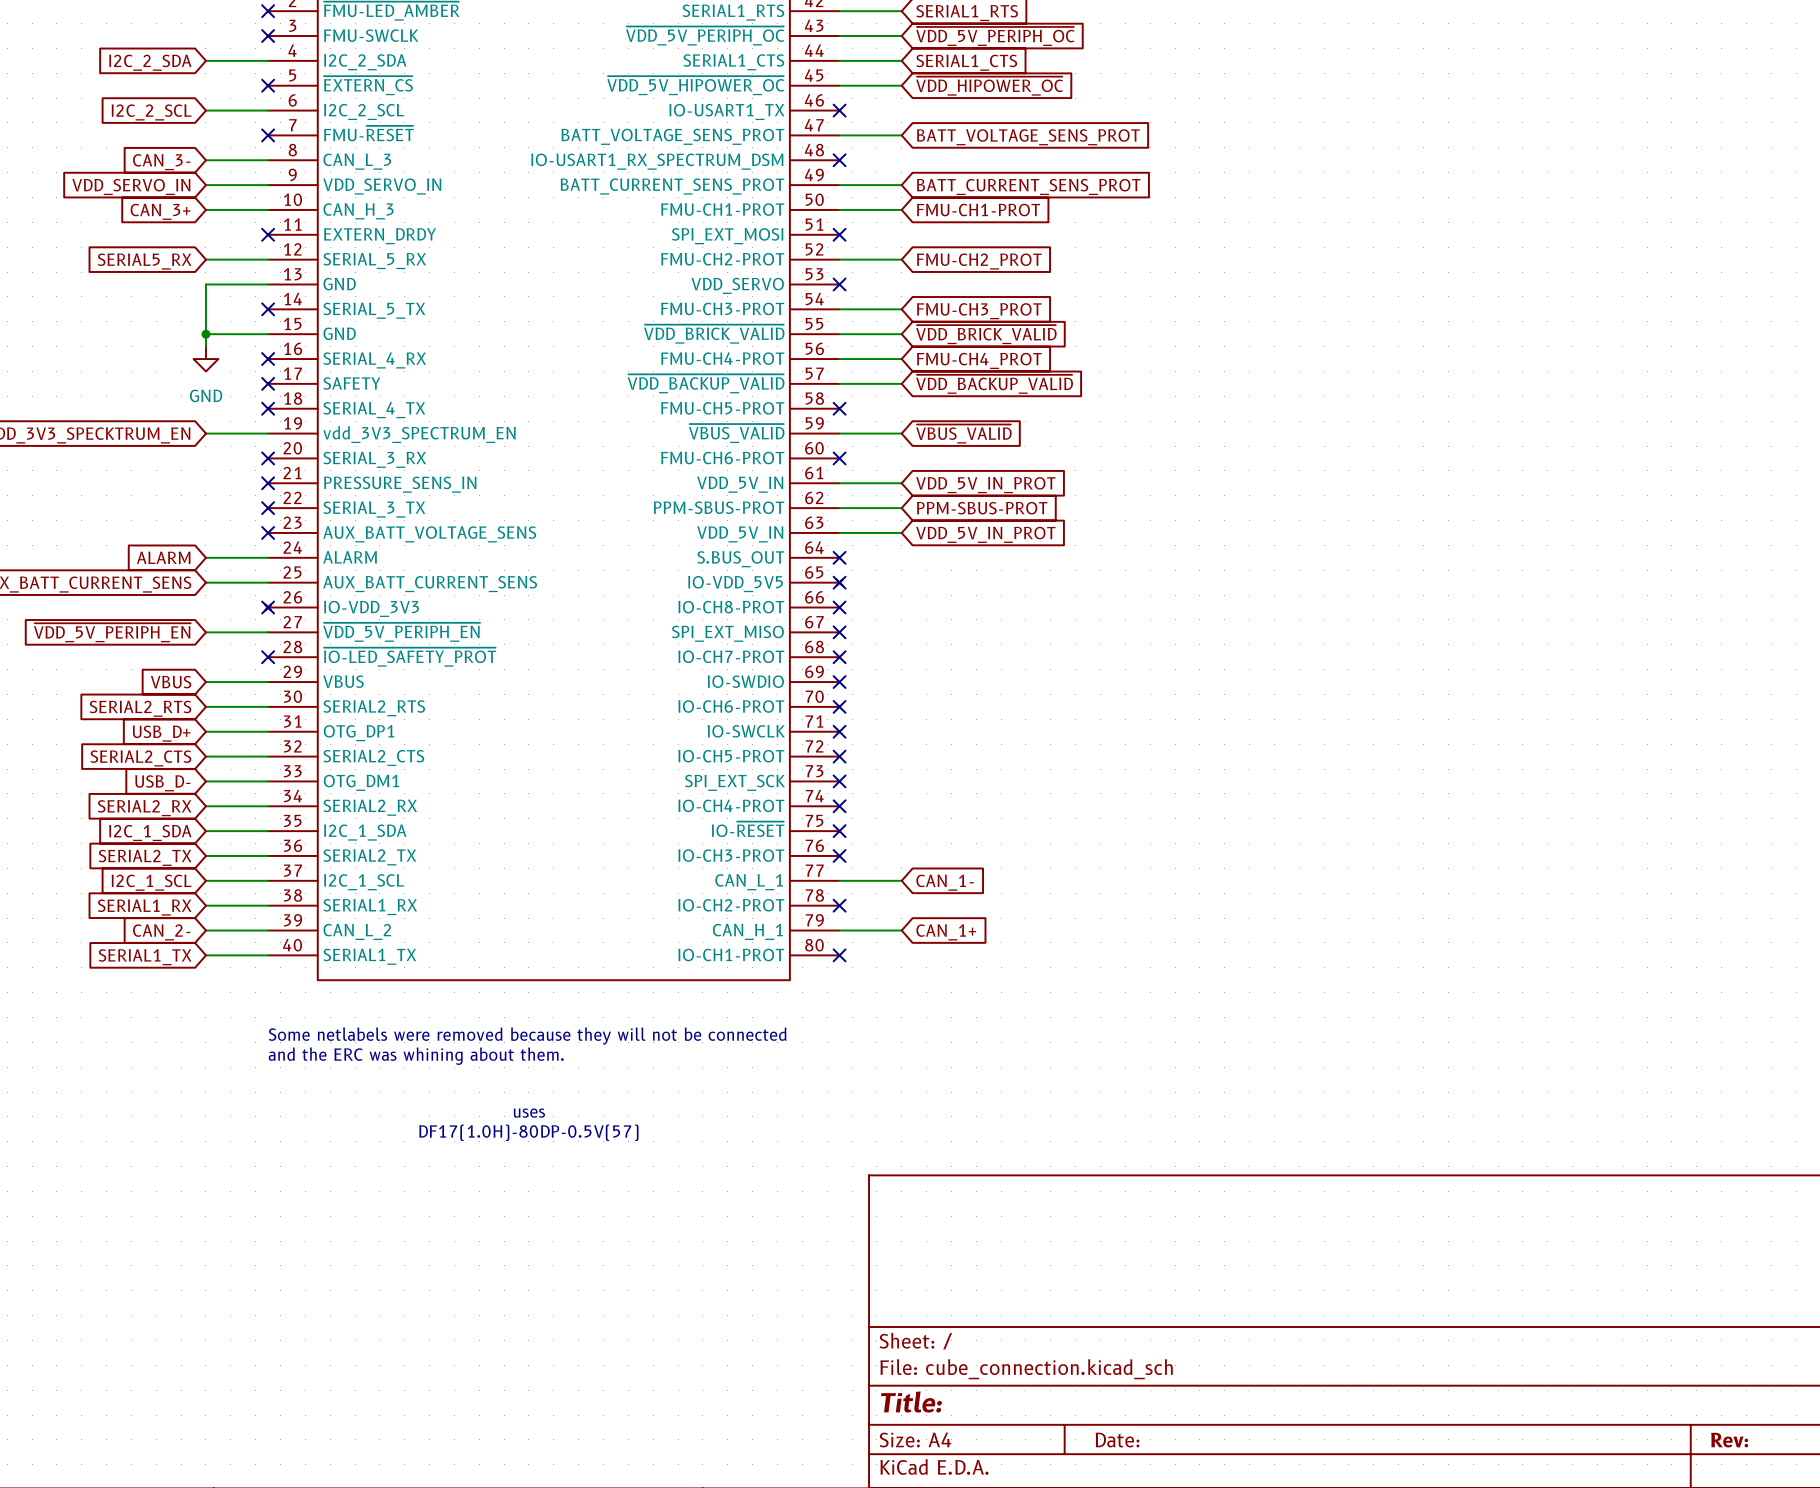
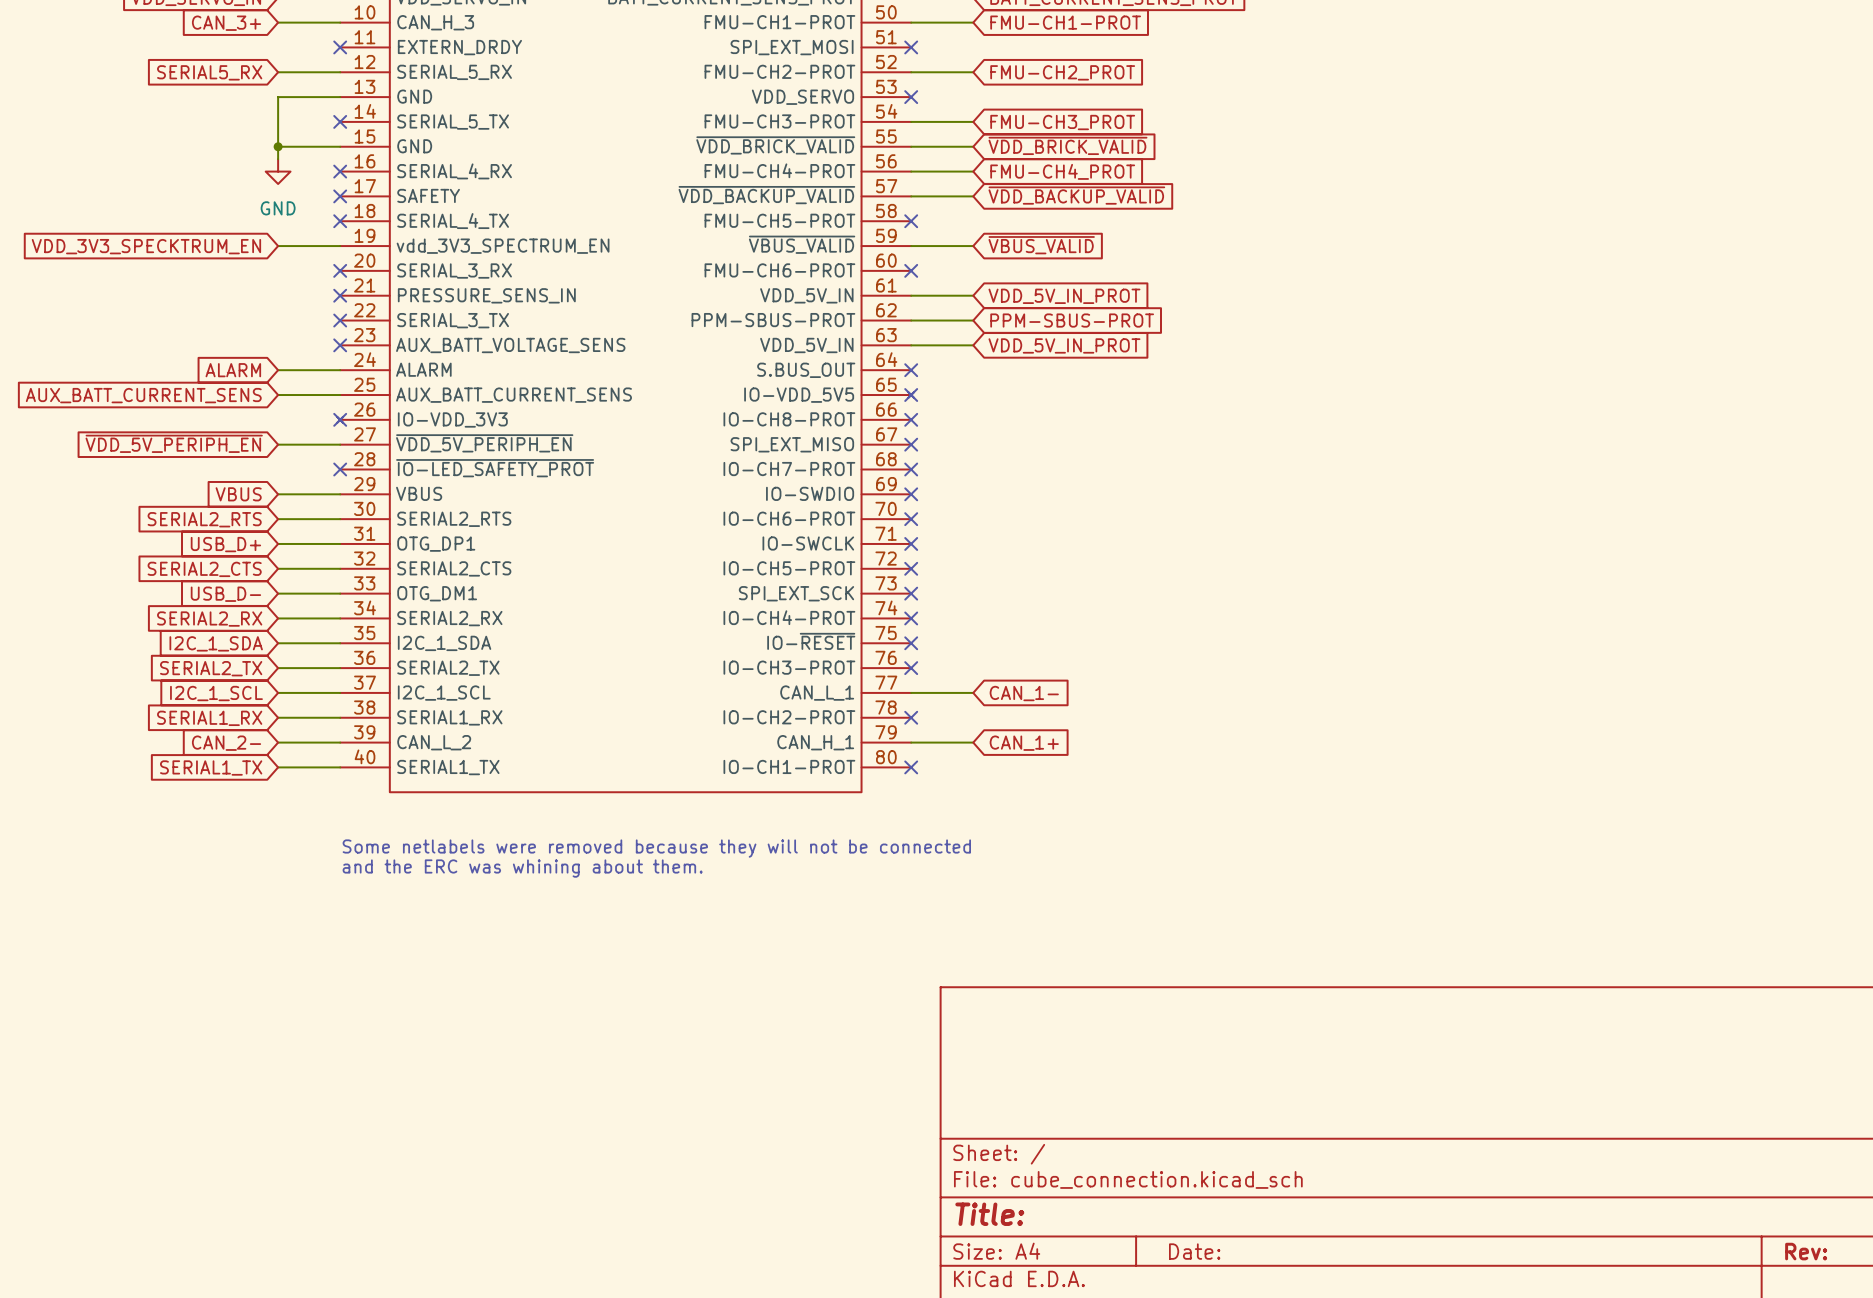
text: uses (529, 1113) -> none
text: DF17(1.0H)-80DP-0.5V(57) (528, 1132) -> none

